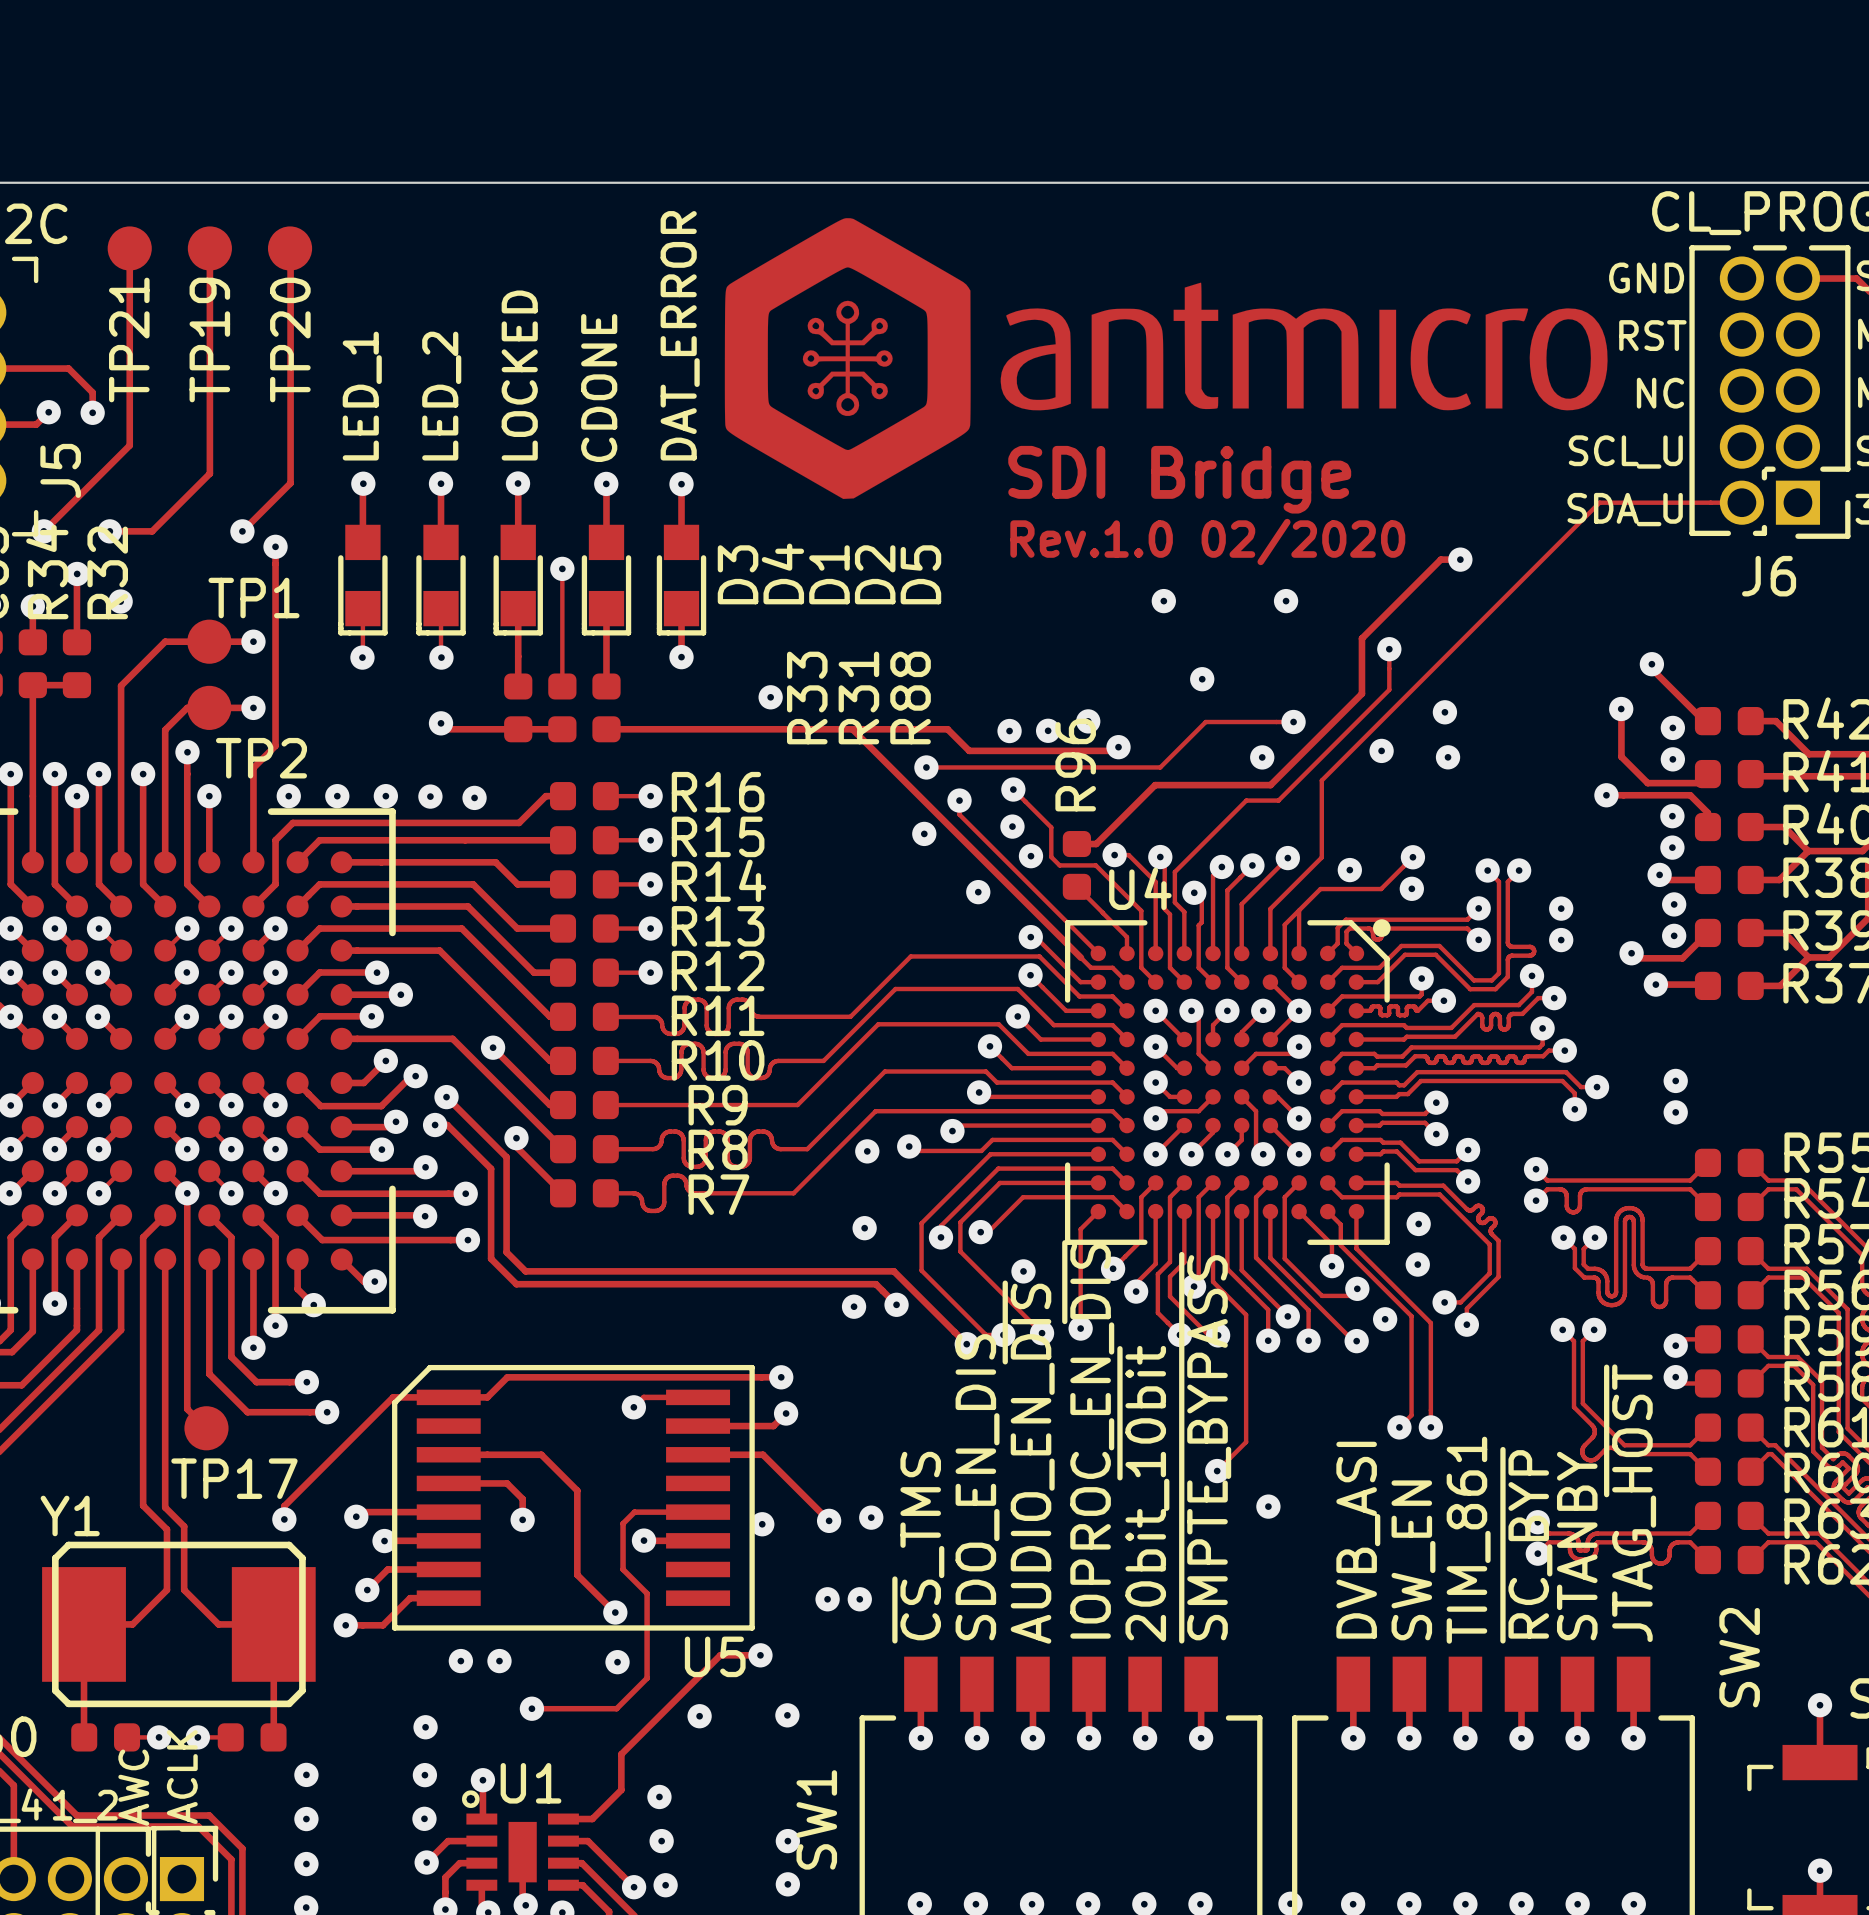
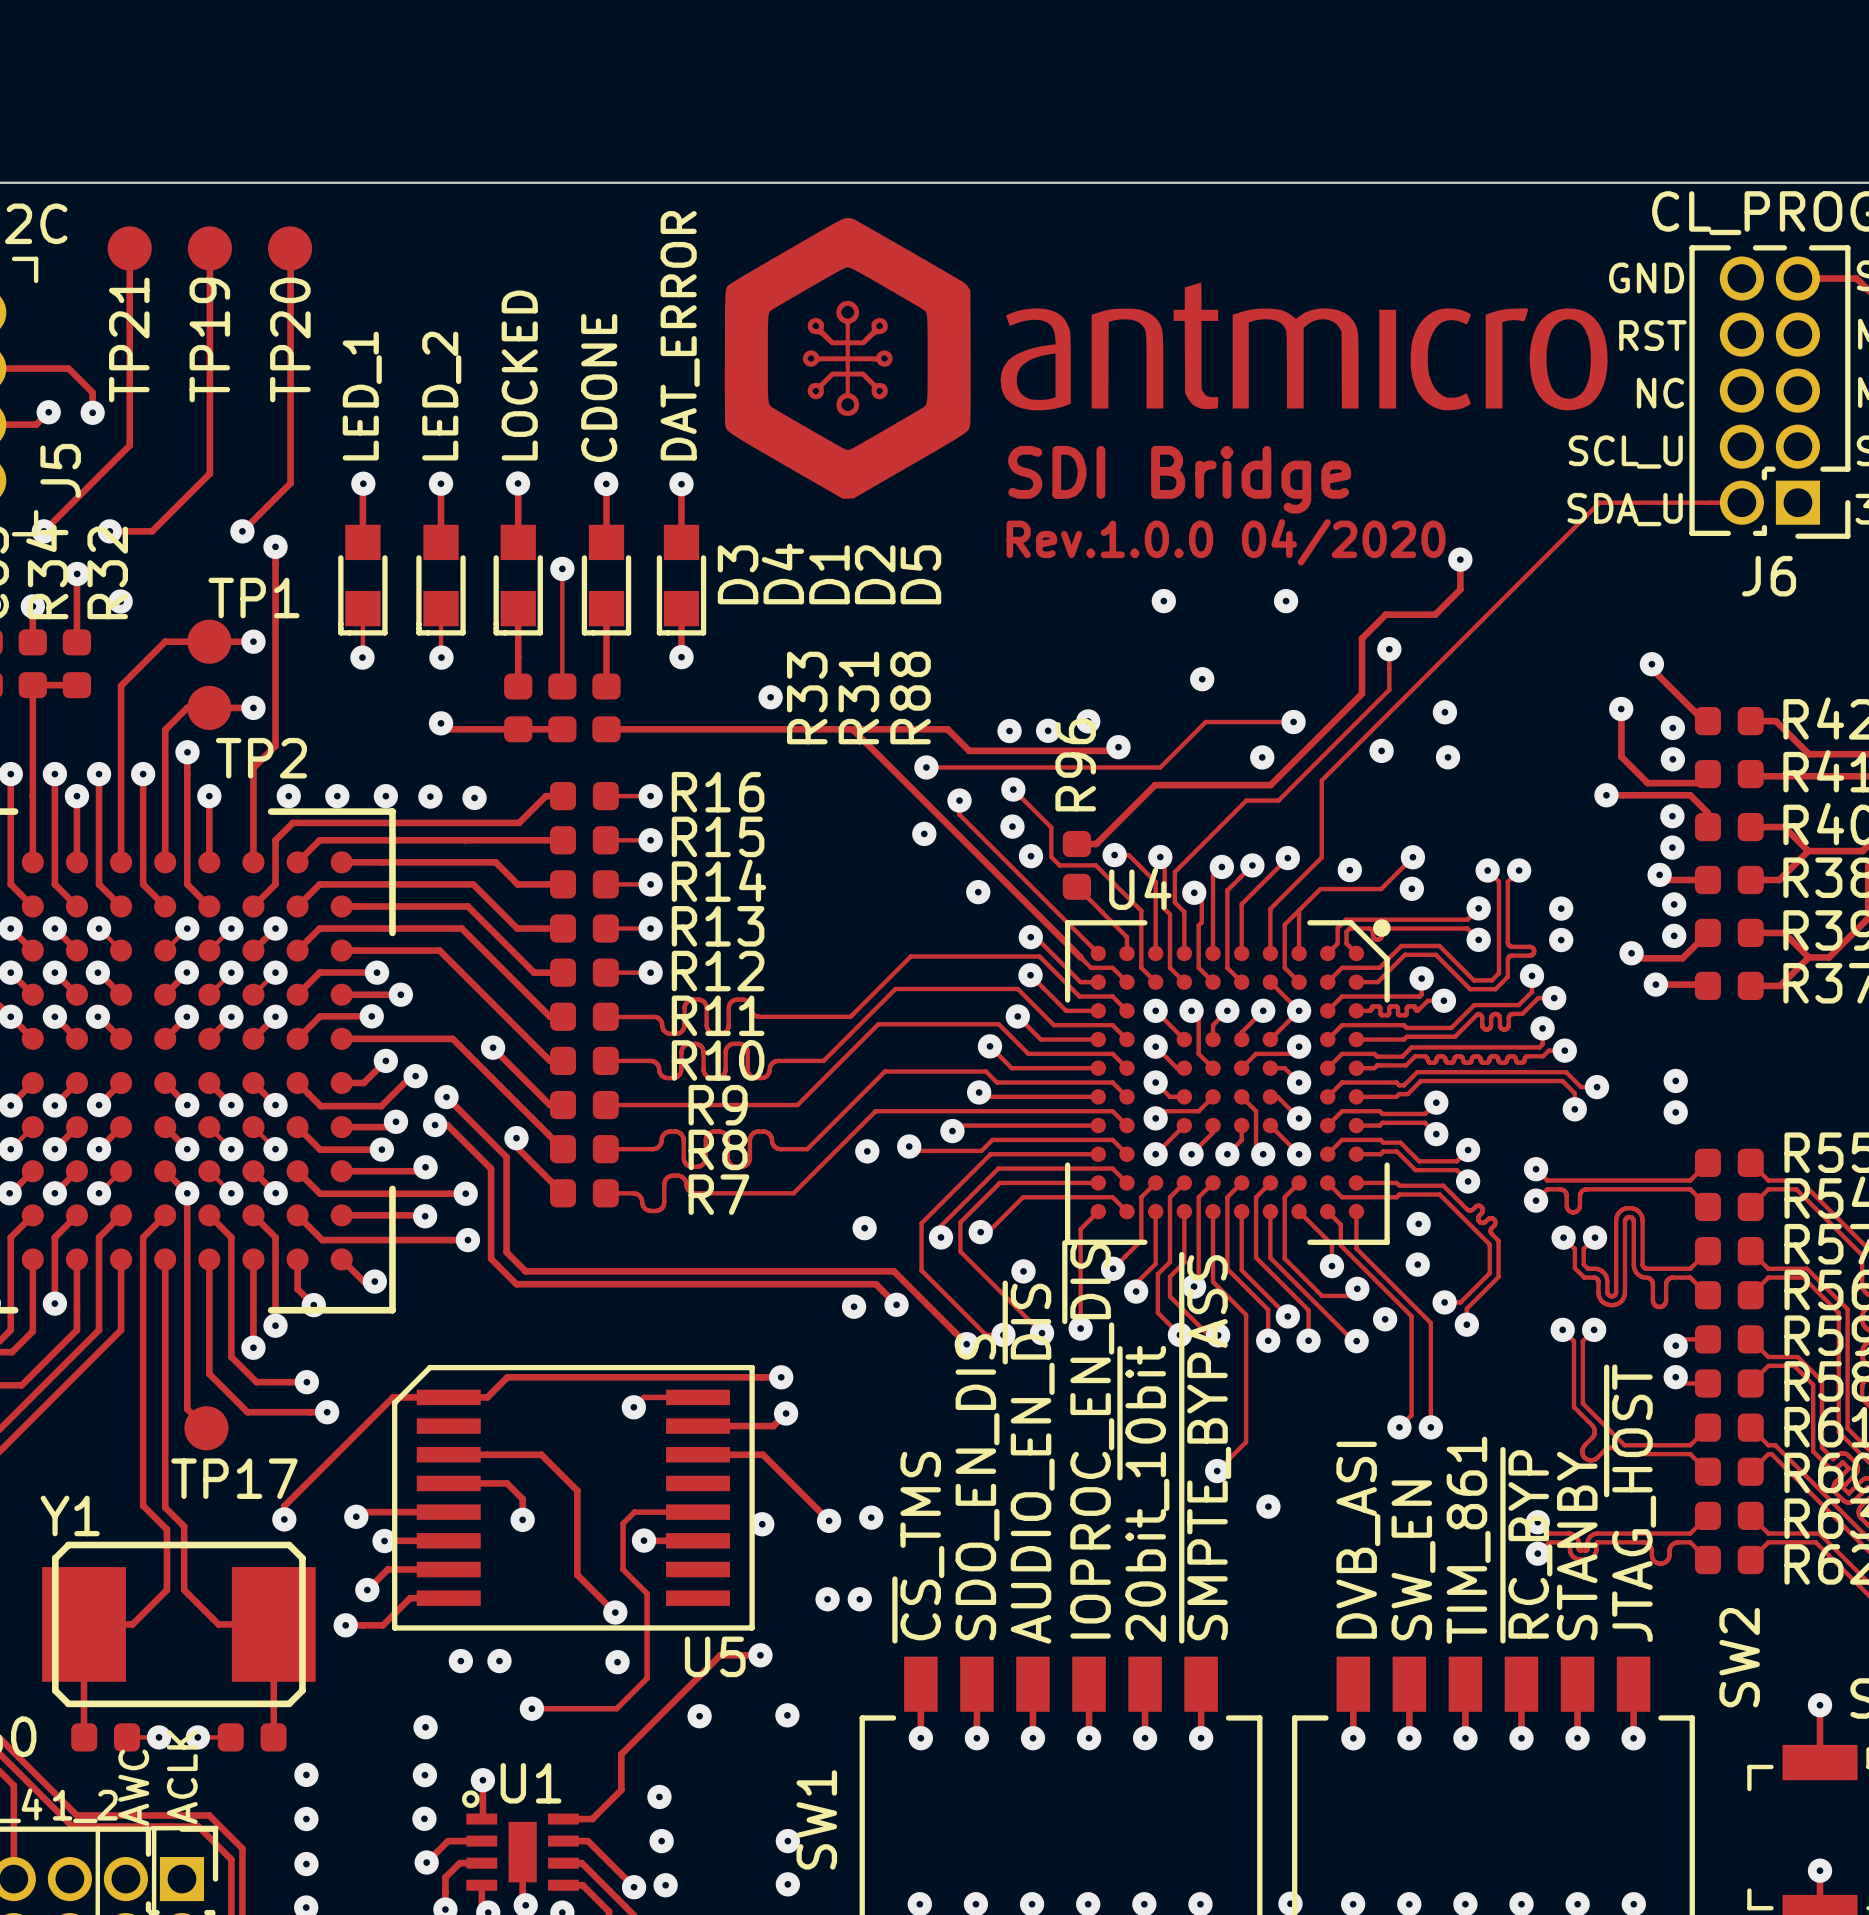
text: Rev.1.0 02/2020 (1207, 541) -> Rev.1.0.0 04/2020 (1226, 542)
track: (1460, 559) (1440, 559) (1385, 614) -> (1460, 559) (1460, 589) (1435, 614) (1385, 614)

